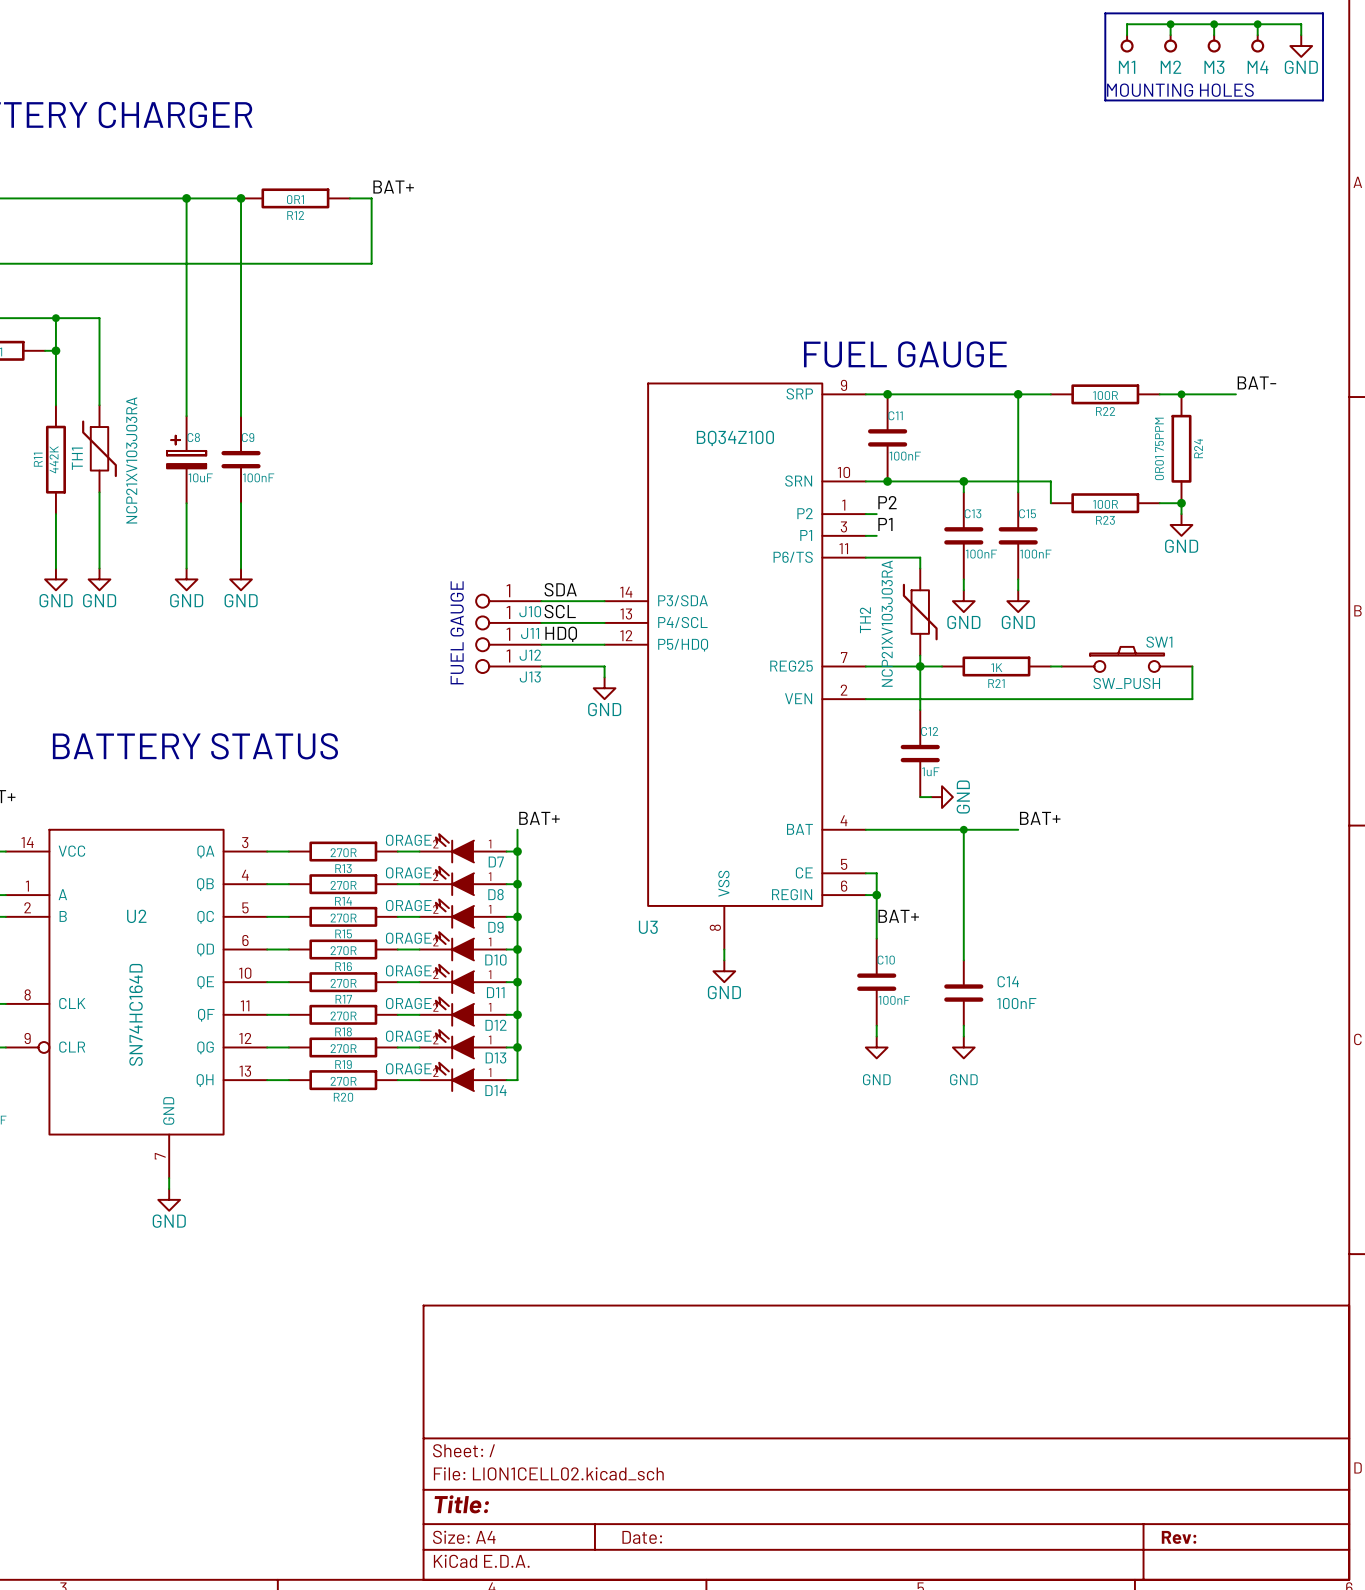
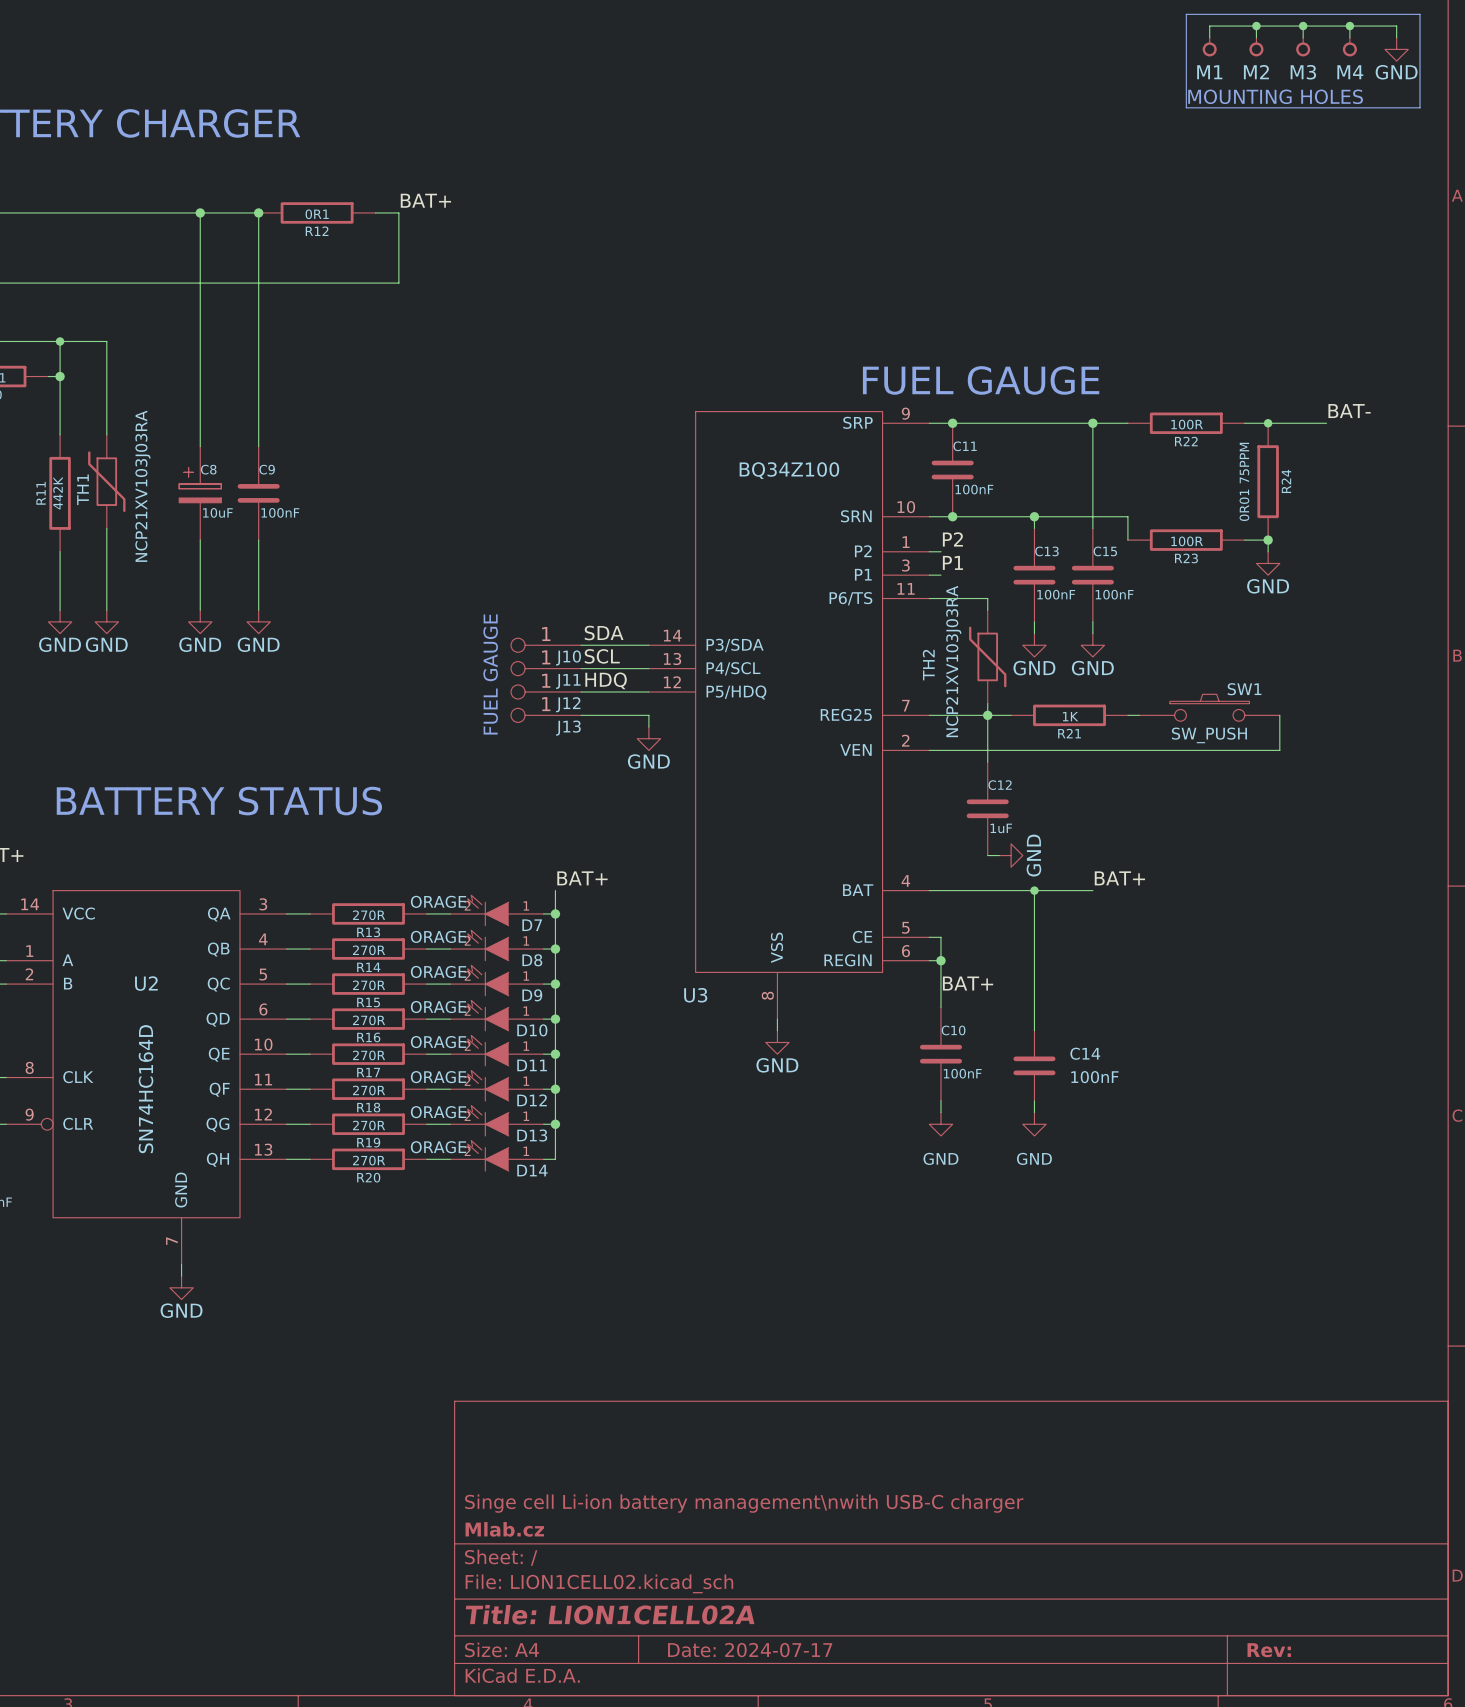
title block: none -> Singe cell Li-ion battery management\nwith USB-C charger (744, 1503)
title block: none -> Mlab.cz (504, 1529)
title block: Title: (461, 1504) -> Title: LION1CELL02A (610, 1614)
title block: Date: (642, 1537) -> Date: 2024-07-17 (750, 1650)

